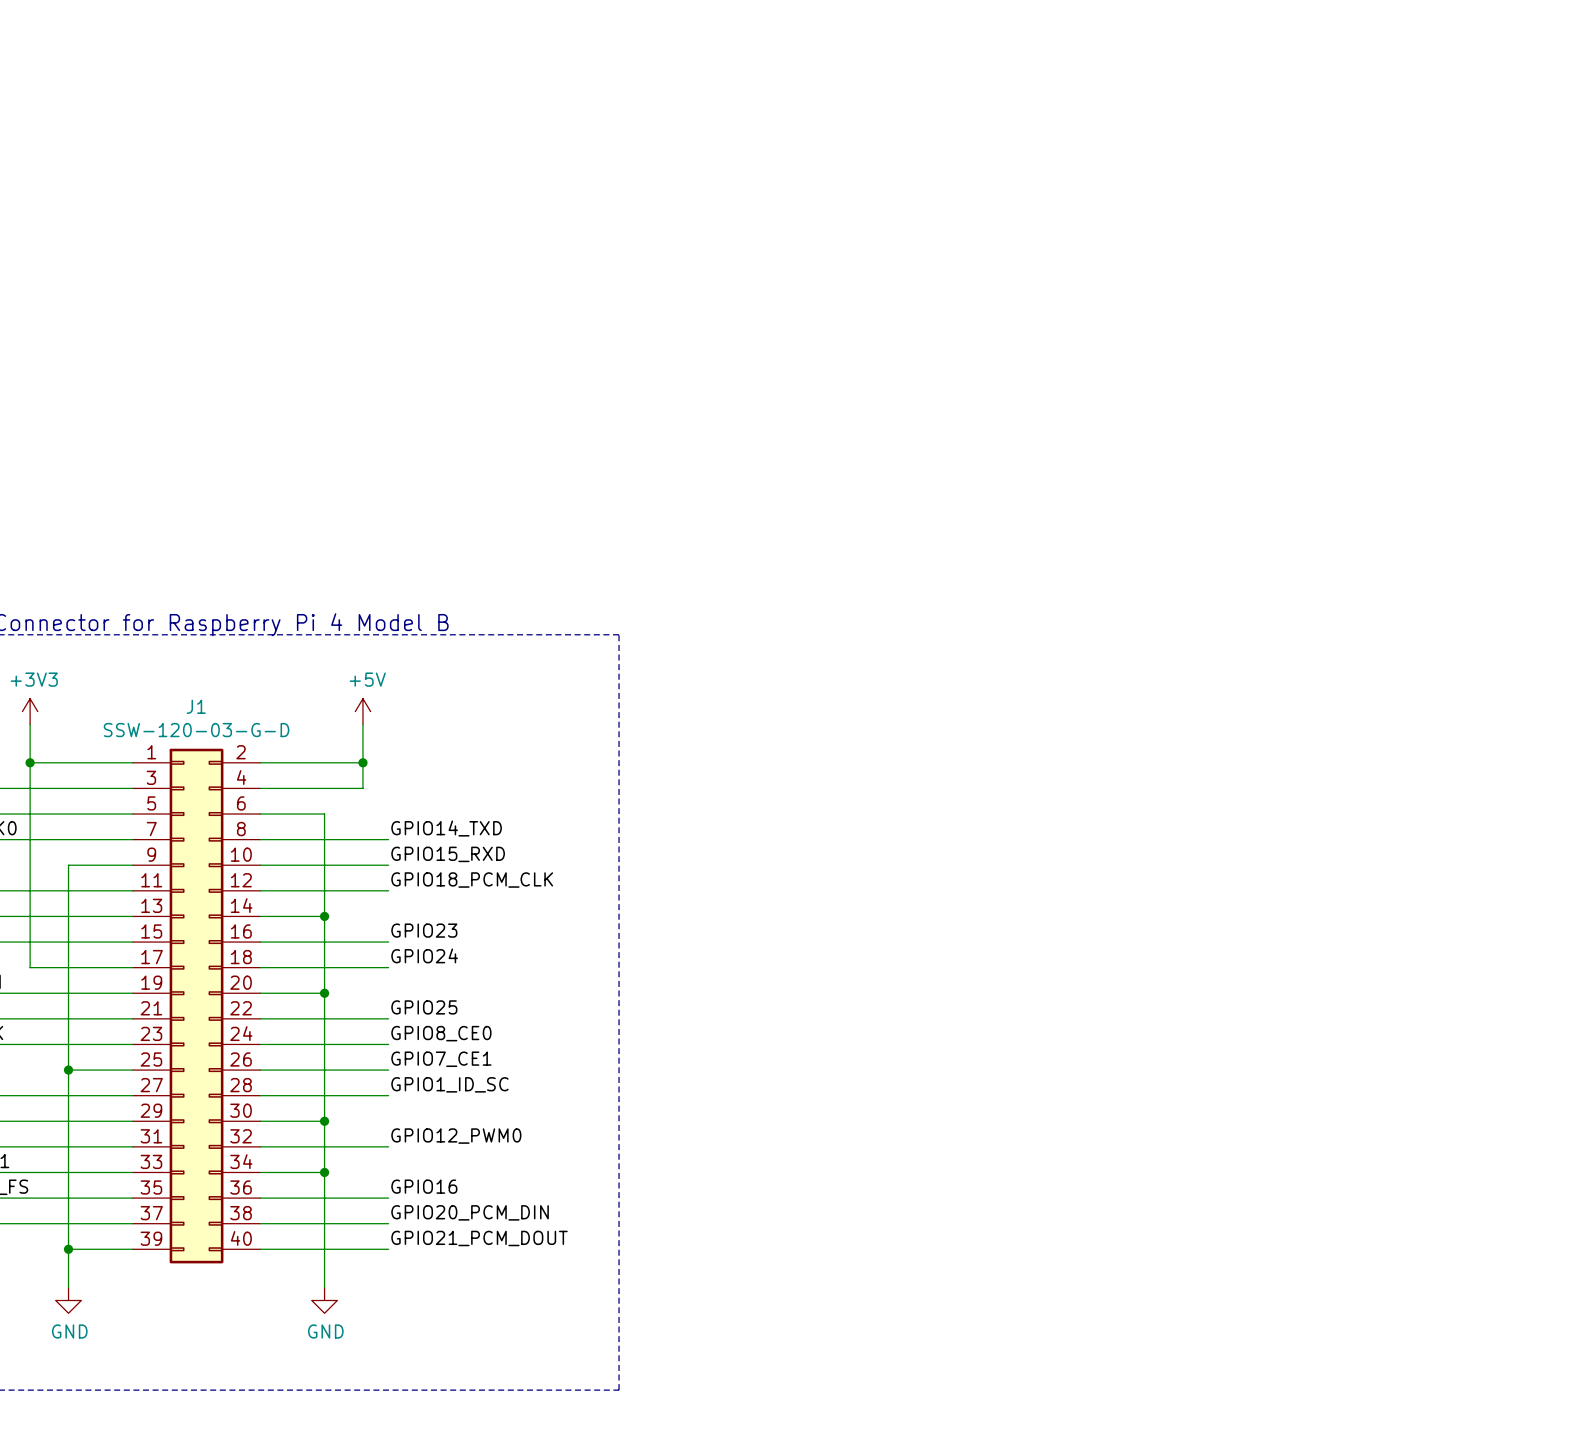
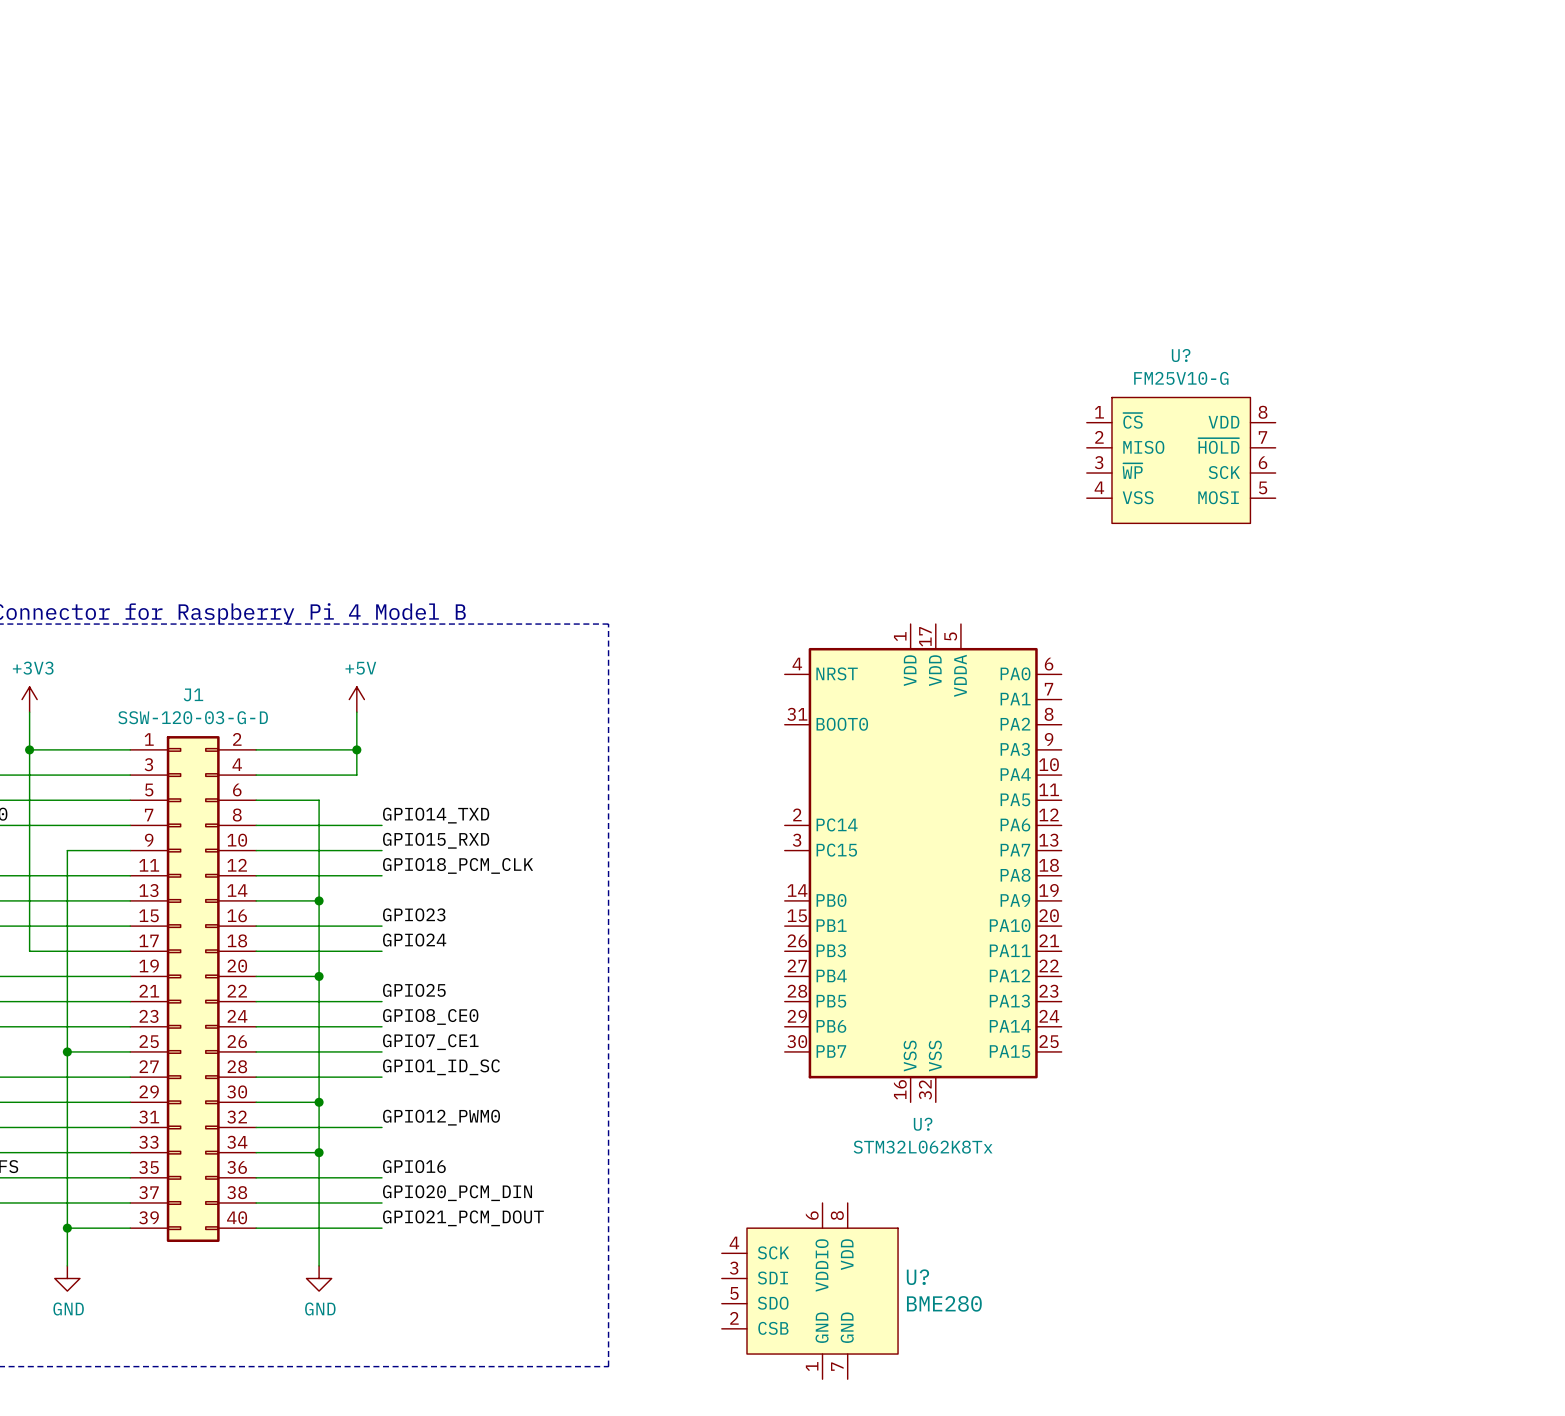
U?: none -> FM25V10-G (1181, 460)
U?: none -> STM32L062K8Tx (923, 863)
U?: none -> BME280 (809, 1291)

